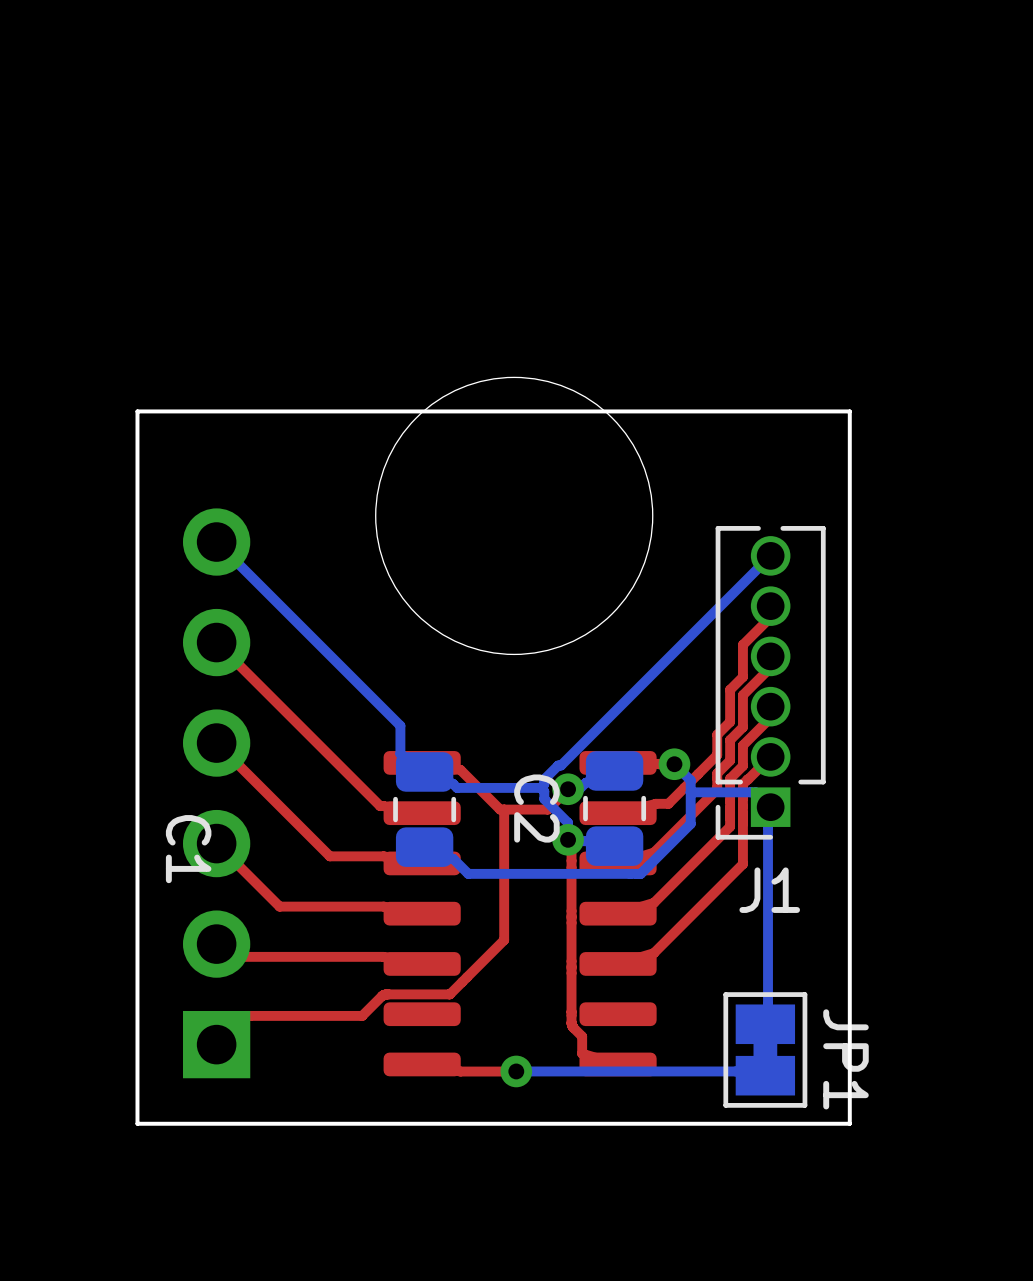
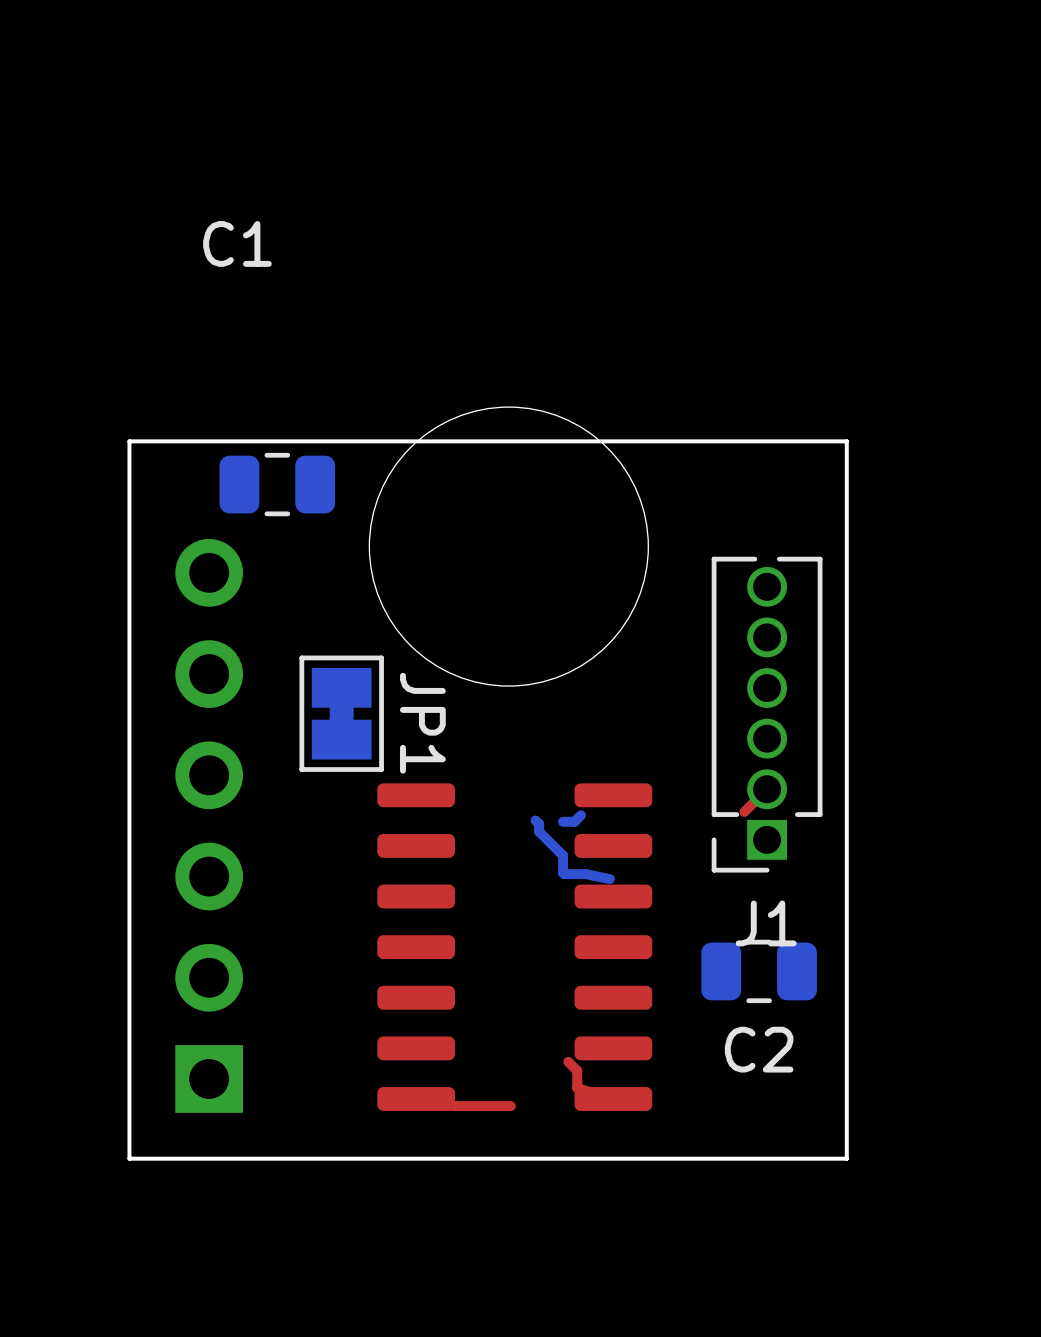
bottom track: (216, 542) (400, 725) (400, 753) (424, 771) (452, 783) (457, 787) (540, 787) (544, 784) (544, 779) (558, 765) (561, 765) (770, 555) -> none
top track: (770, 606) (770, 617) (742, 644) (742, 676) (730, 689) (730, 721) (717, 734) (717, 755) (668, 803) (655, 803) -> none
top track: (216, 642) (380, 806) (422, 813) -> none
top track: (770, 656) (770, 667) (742, 695) (742, 727) (730, 740) (730, 760) (717, 773) (717, 789) (653, 852) (618, 863) -> none
top track: (770, 706) (770, 717) (742, 745) (742, 765) (730, 778) (730, 826) (653, 902) (618, 913) -> none
top track: (216, 743) (329, 856) (383, 856) (422, 863) -> none
top track: (422, 762) (460, 769) (500, 809) (547, 809) (568, 789) -> none
bottom track: (674, 764) (690, 780) (690, 823) (640, 873) (468, 873) (453, 858) -> none
via: (674, 764) -> none
top track: (747, 779) (742, 784) (742, 864) (653, 953) (618, 963) -> none
via: (568, 789) -> none
bottom track: (690, 792) (755, 792) (770, 807) (768, 822) (768, 1009) (765, 1024) -> none
C2 name position: C2 (536, 808) -> C2 (759, 1049)
C2 rotation: 0° (614, 808) -> 90° clockwise (759, 971)
C2 position: (614, 808) -> (759, 971)
C1 rotation: 0° (424, 809) -> 90° clockwise (277, 484)
C1 position: (424, 809) -> (277, 484)
top track: (504, 809) (504, 940) (449, 994) (386, 994) -> none
via: (568, 839) -> none
top track: (216, 843) (279, 906) (383, 906) (422, 913) -> none
top track: (216, 944) (229, 956) (383, 956) (422, 963) -> none
top track: (382, 996) (362, 1015) (245, 1015) (216, 1044) -> none
JP1 position: (765, 1049) -> (341, 713)
bottom track: (516, 1071) (740, 1071) (765, 1075) -> none
via: (516, 1071) -> none

